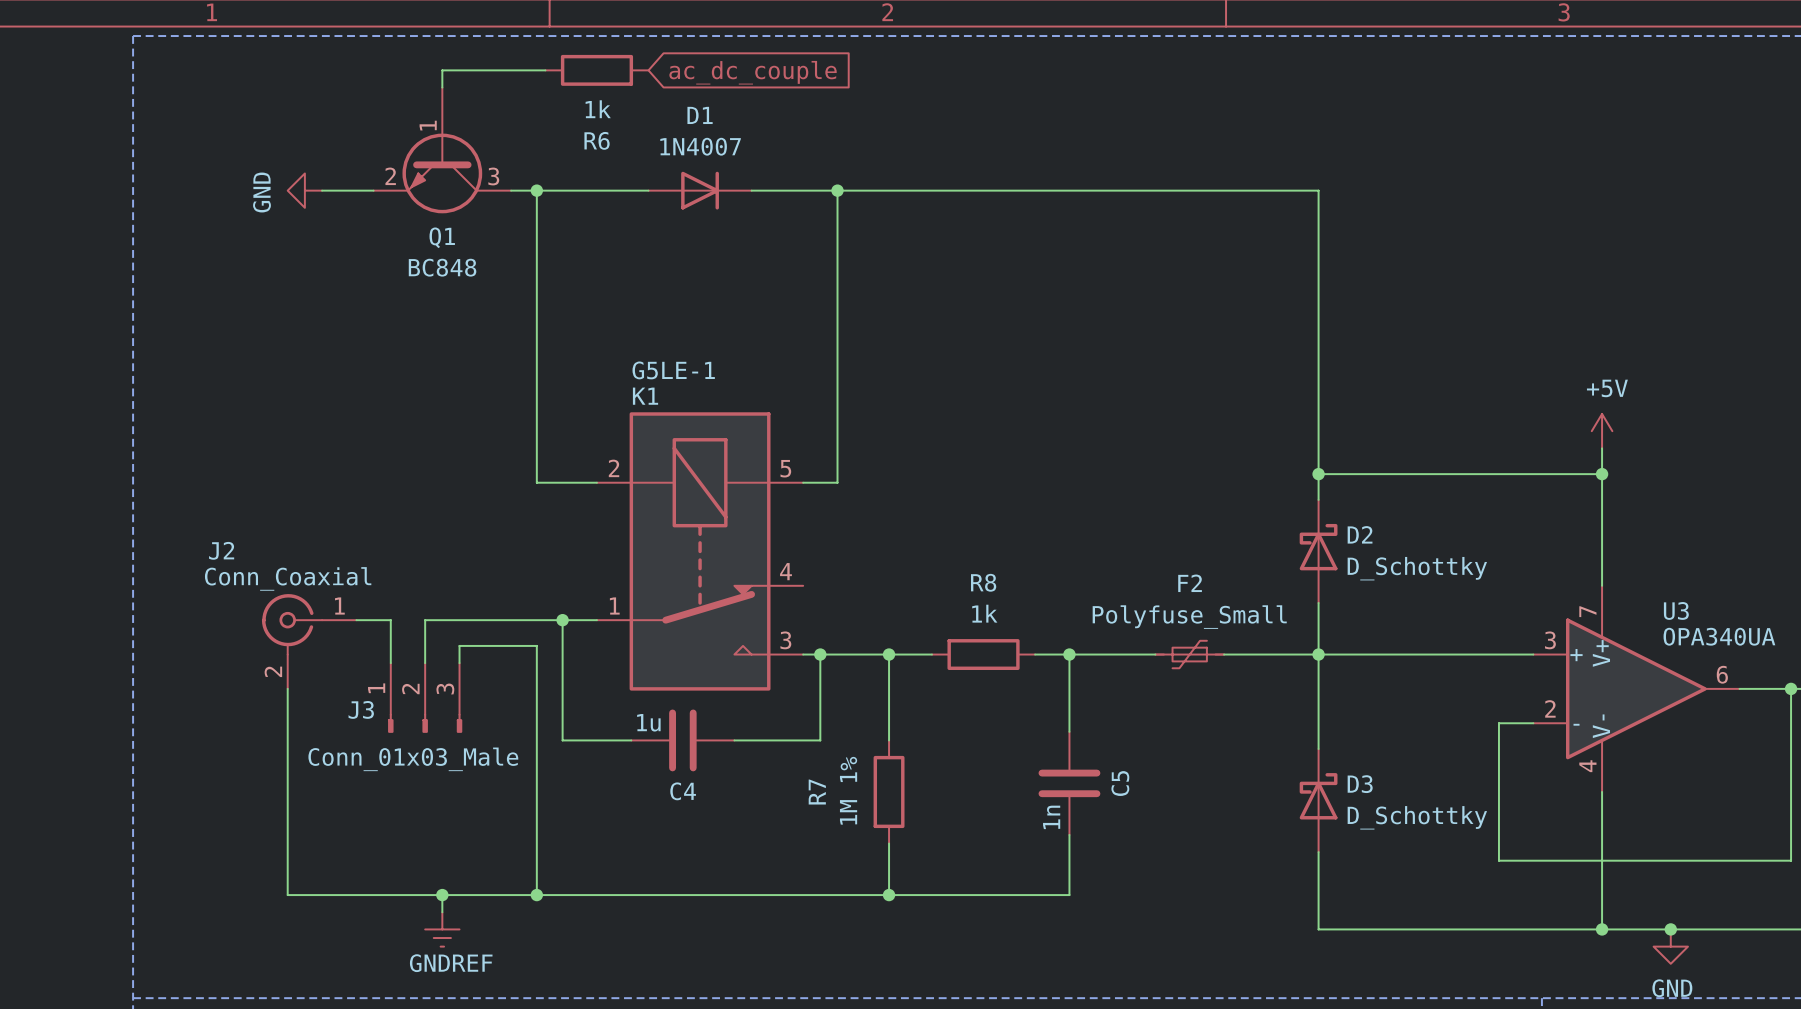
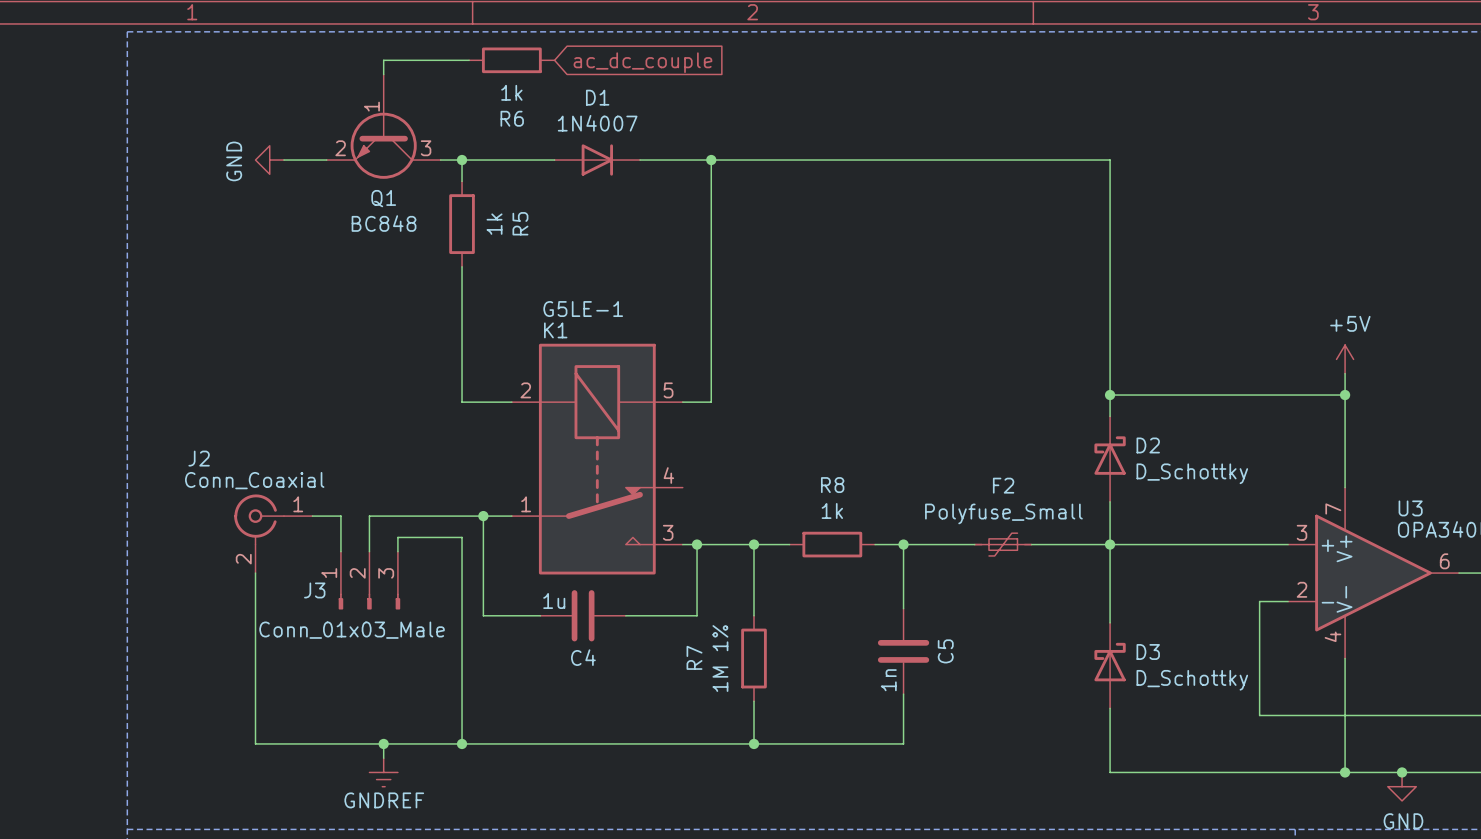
wire: (536, 216) (536, 319) -> none
R5: none -> 1k (462, 224)

